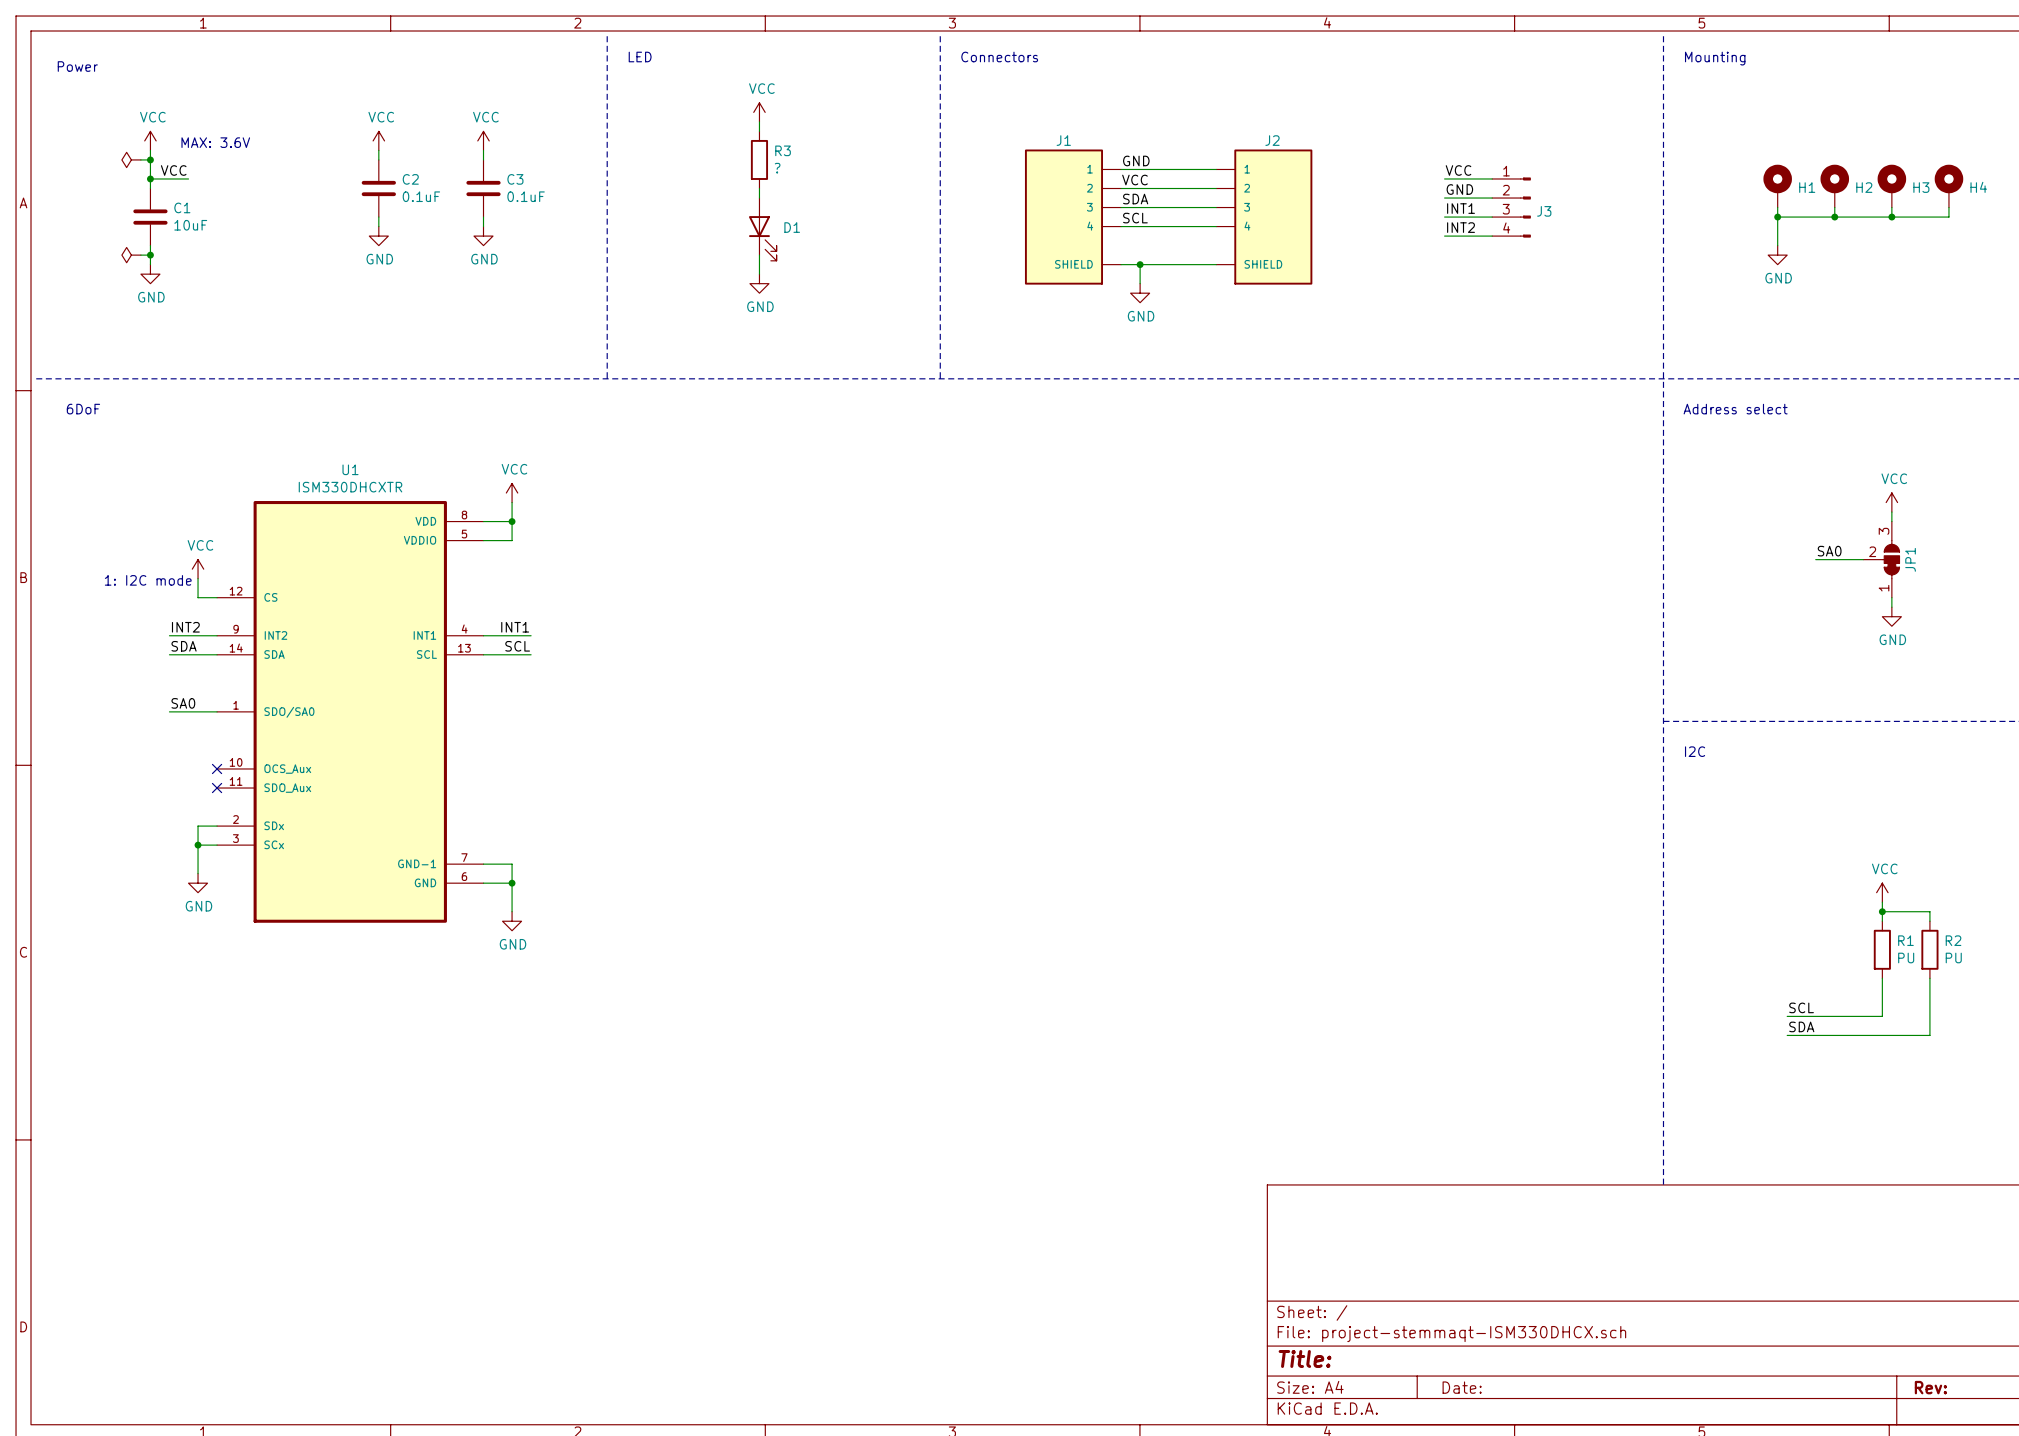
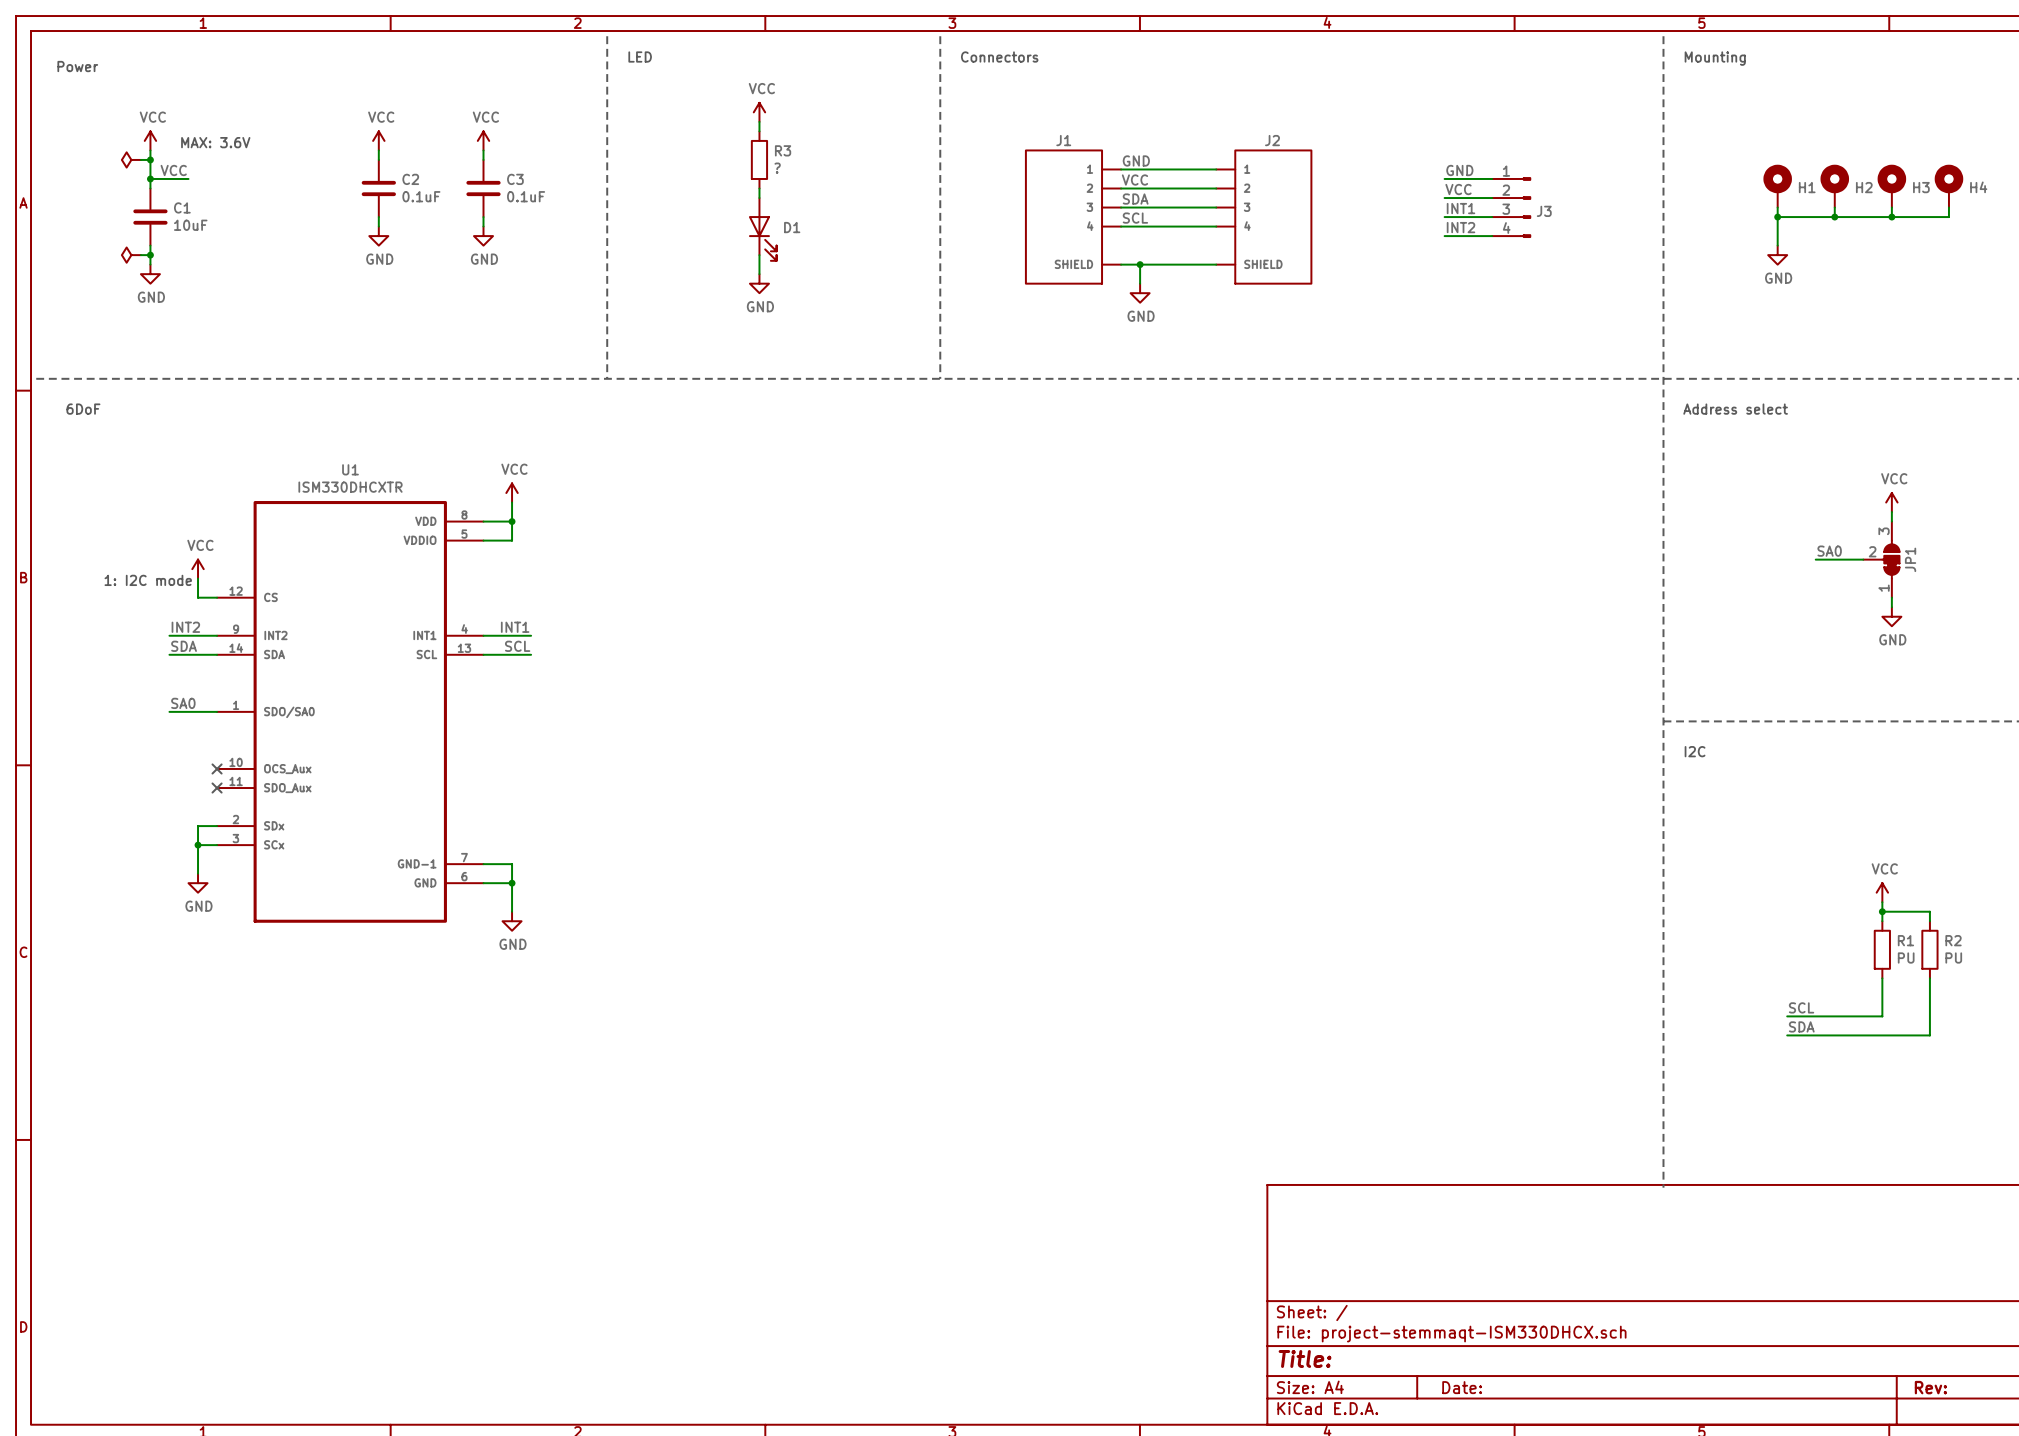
label: VCC (1458, 170) -> GND (1459, 170)
label: GND (1459, 189) -> VCC (1458, 189)

